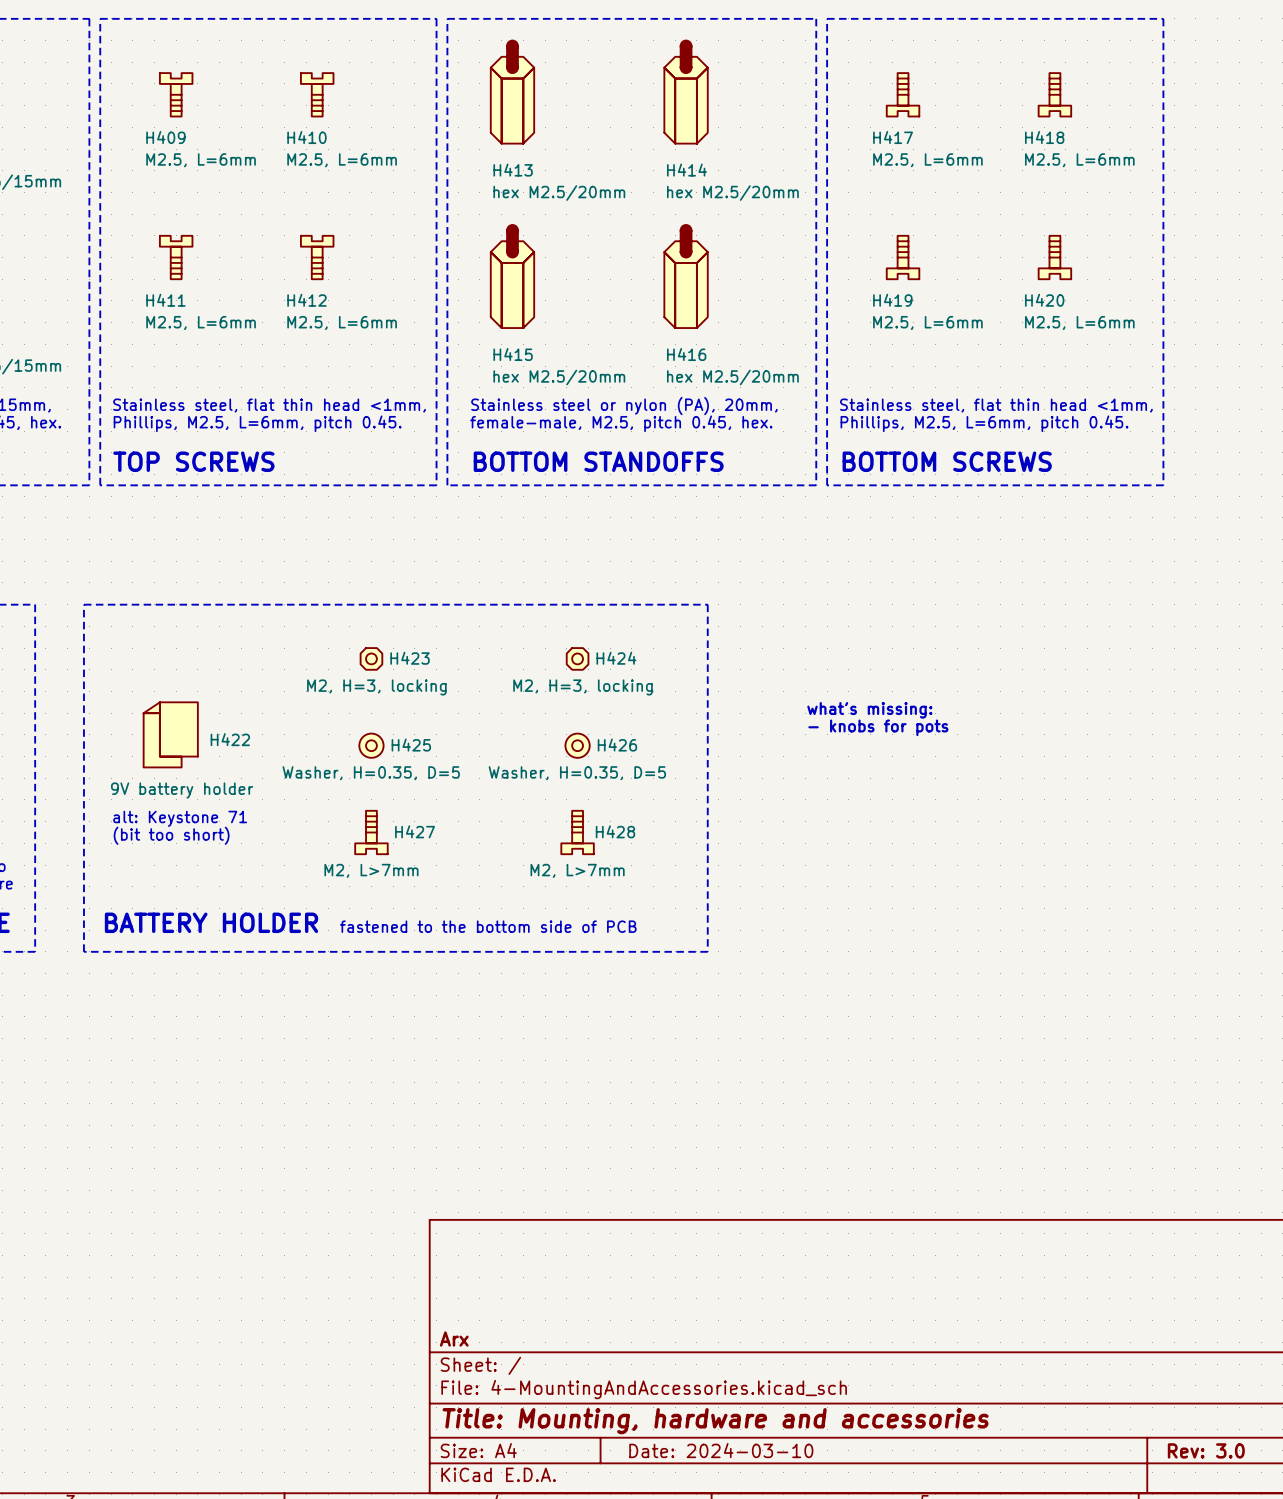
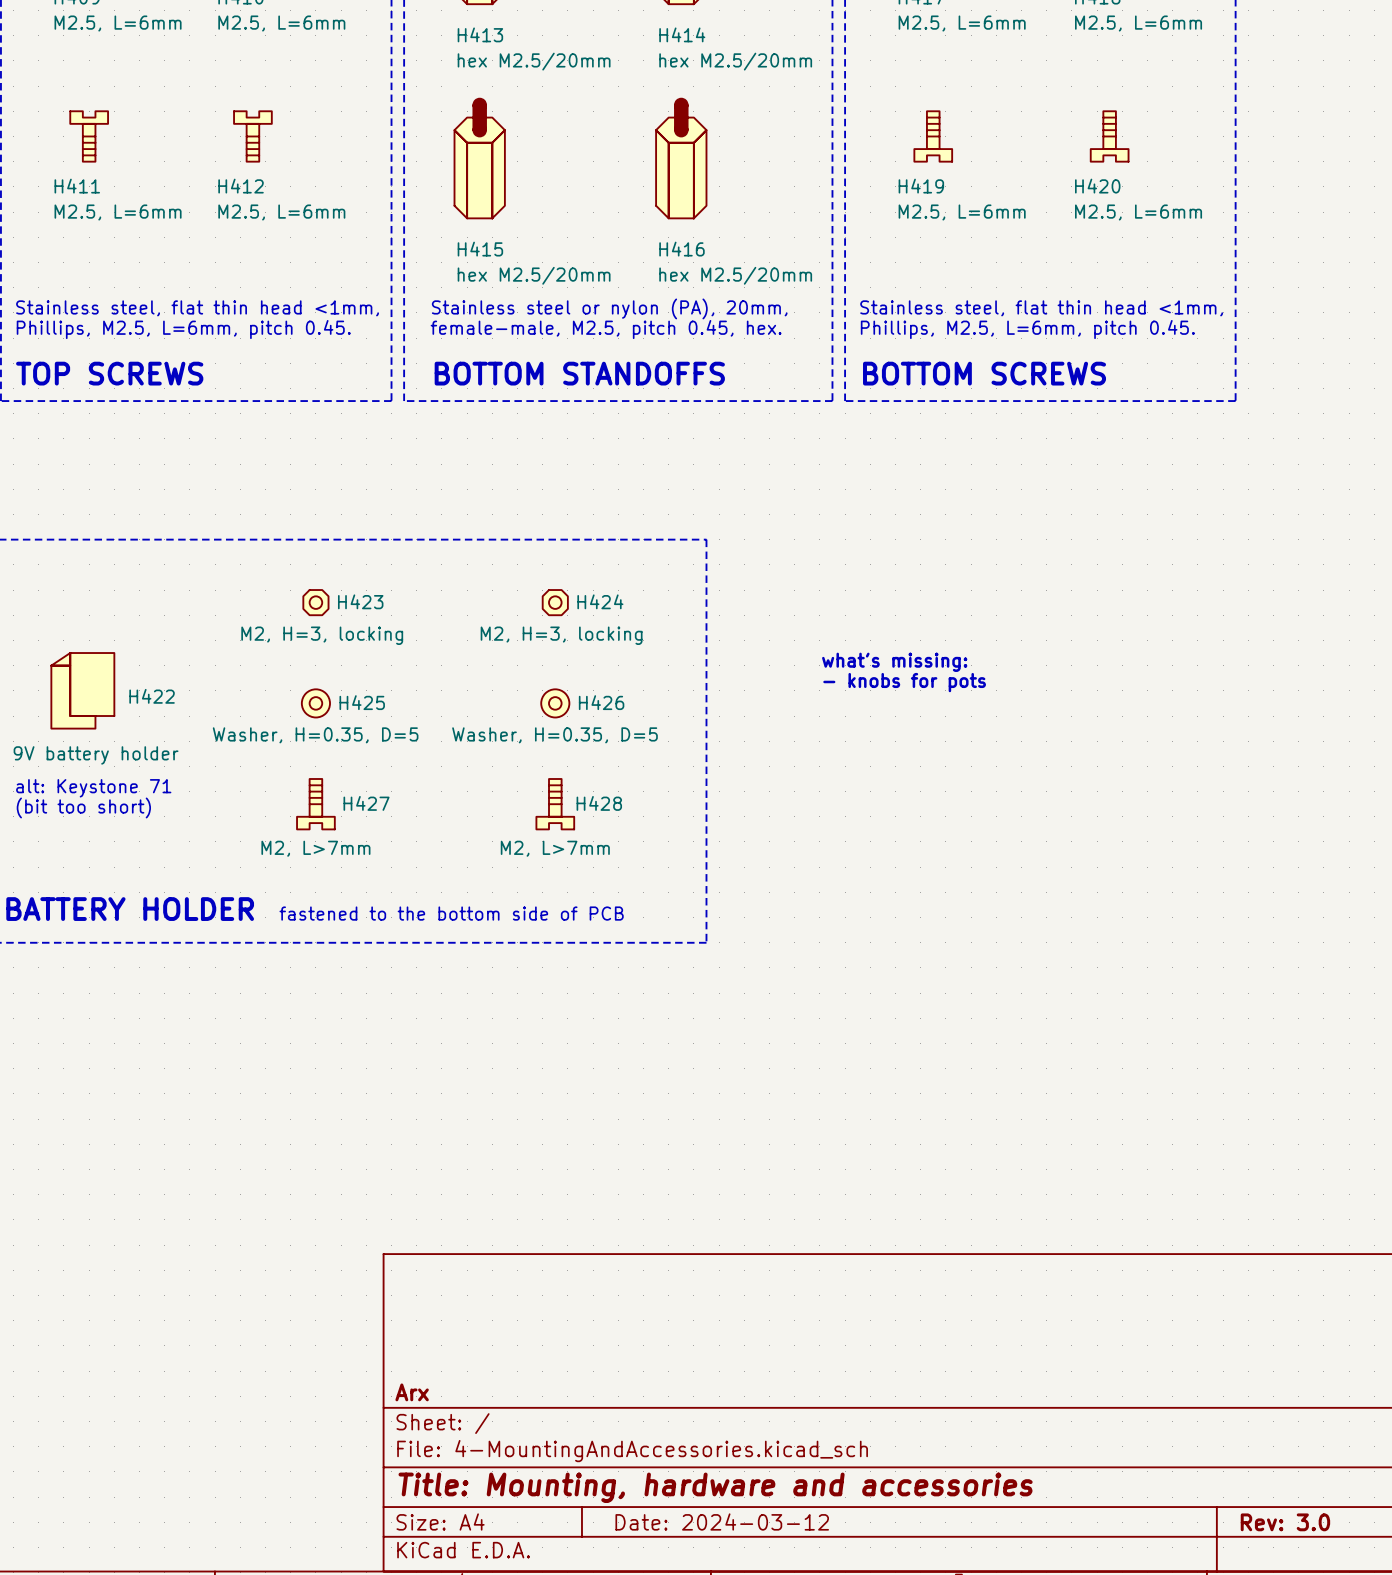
title block: Date: 2024-03-10 (721, 1450) -> Date: 2024-03-12 (722, 1522)

